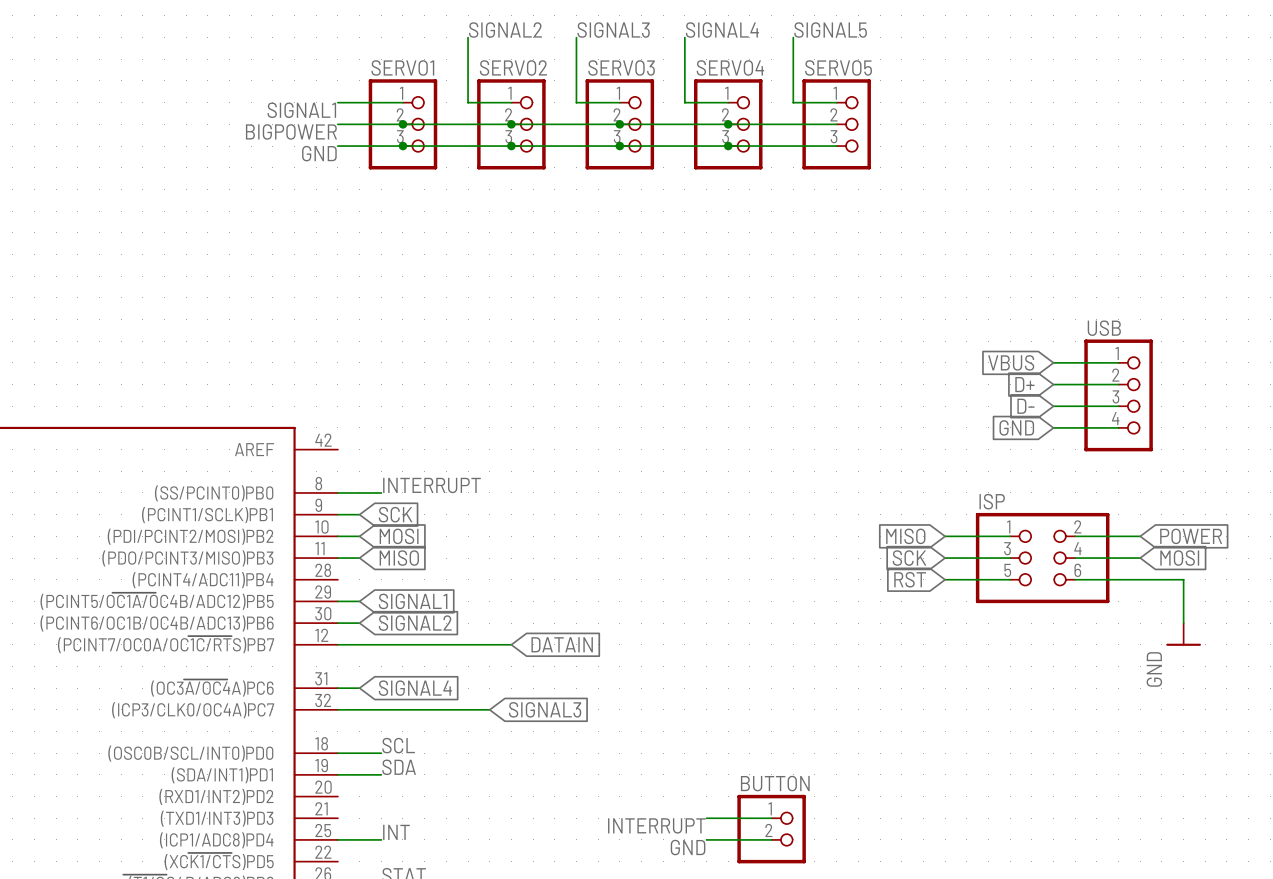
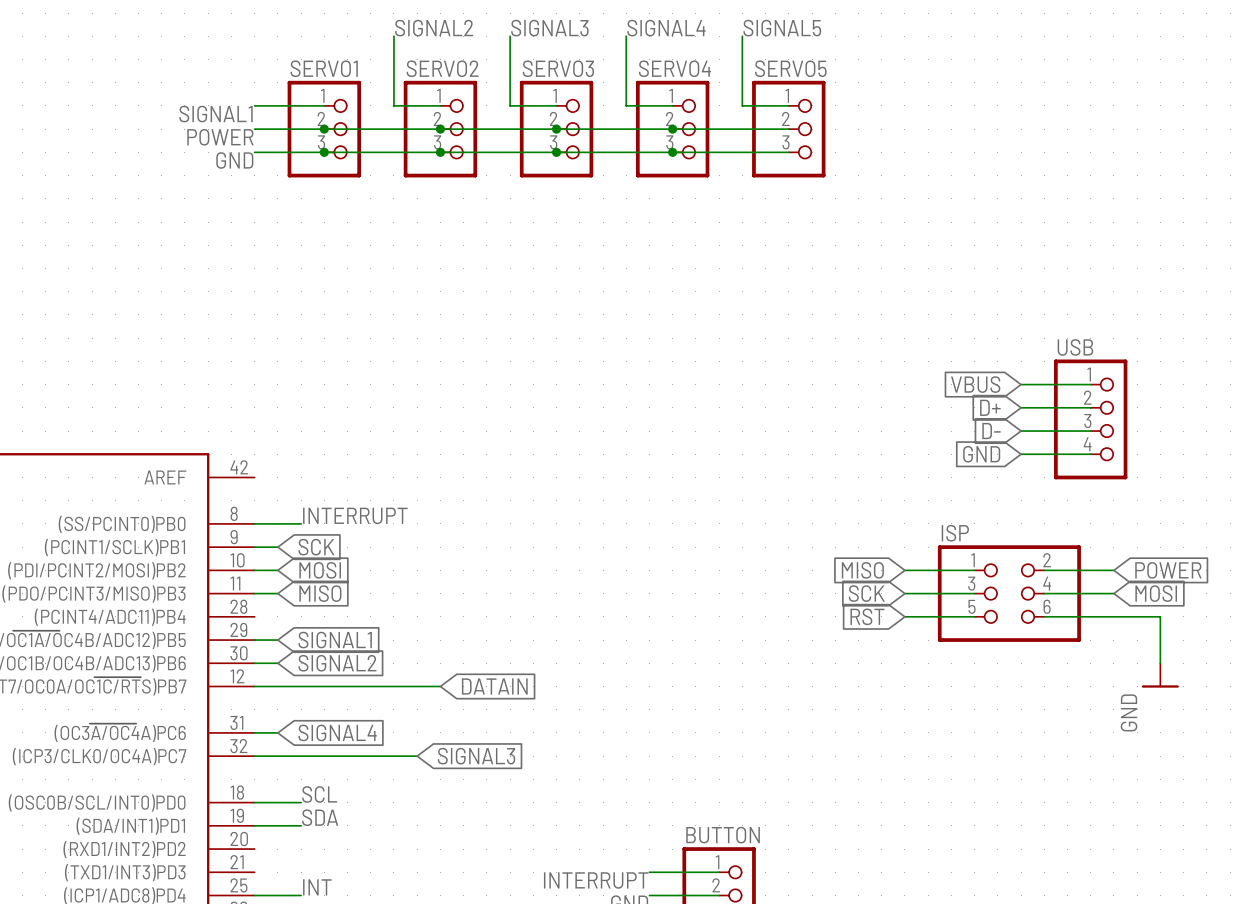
label: BIGPOWER (291, 131) -> POWER (220, 137)

